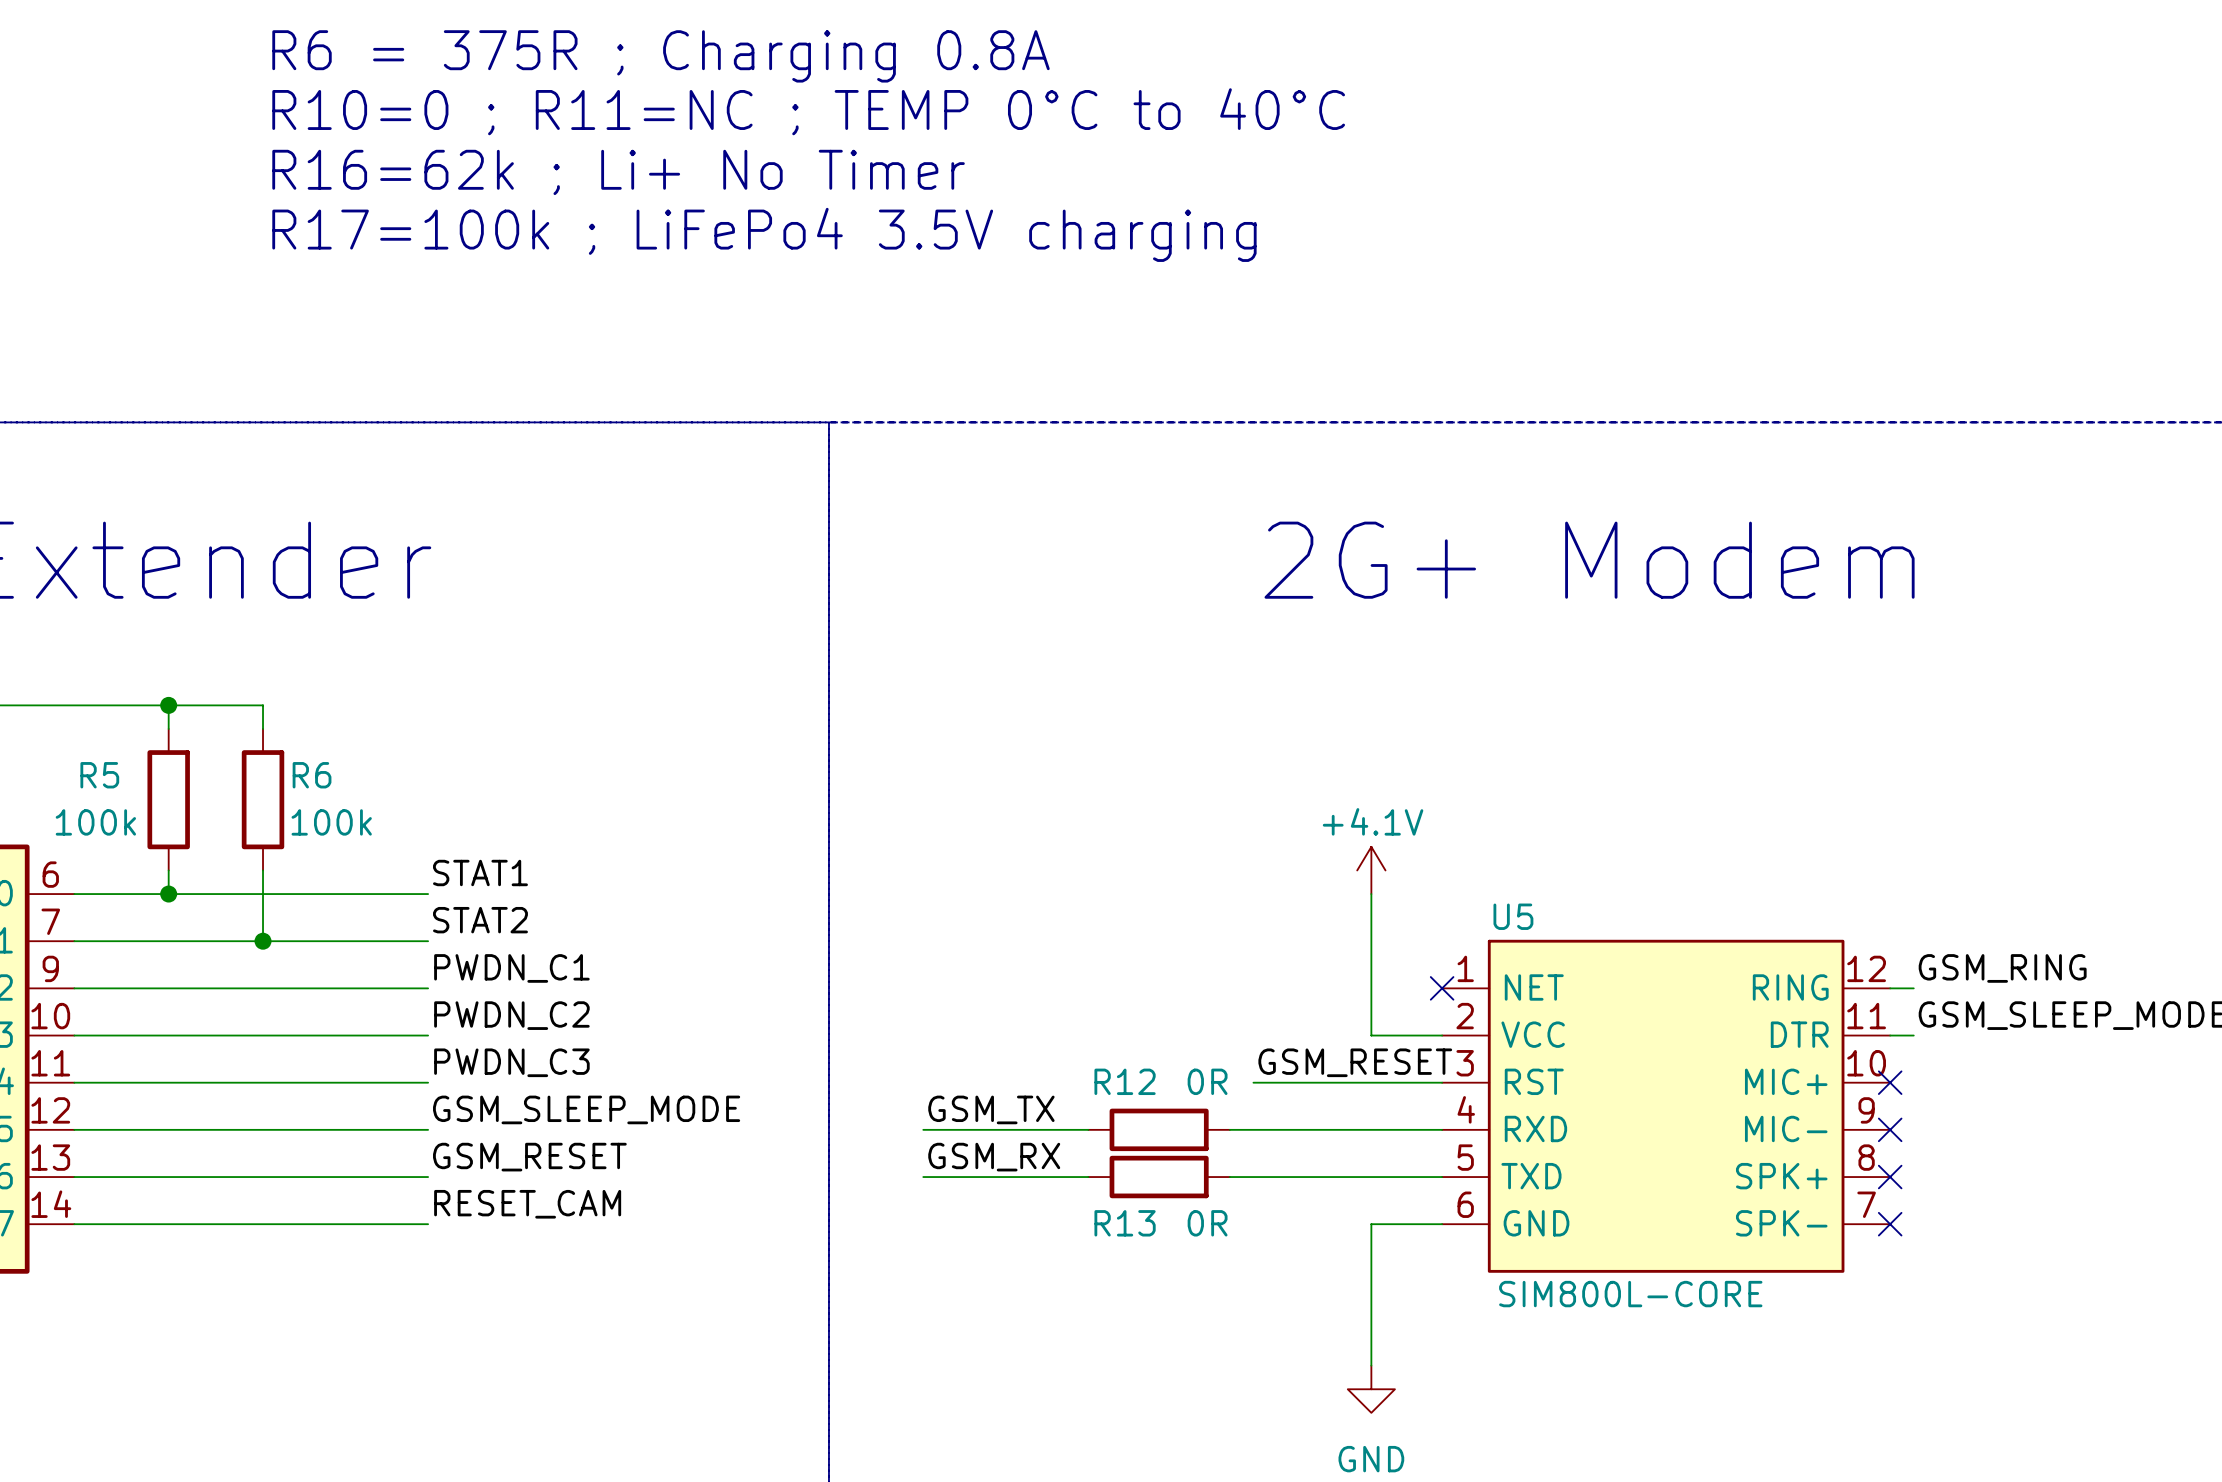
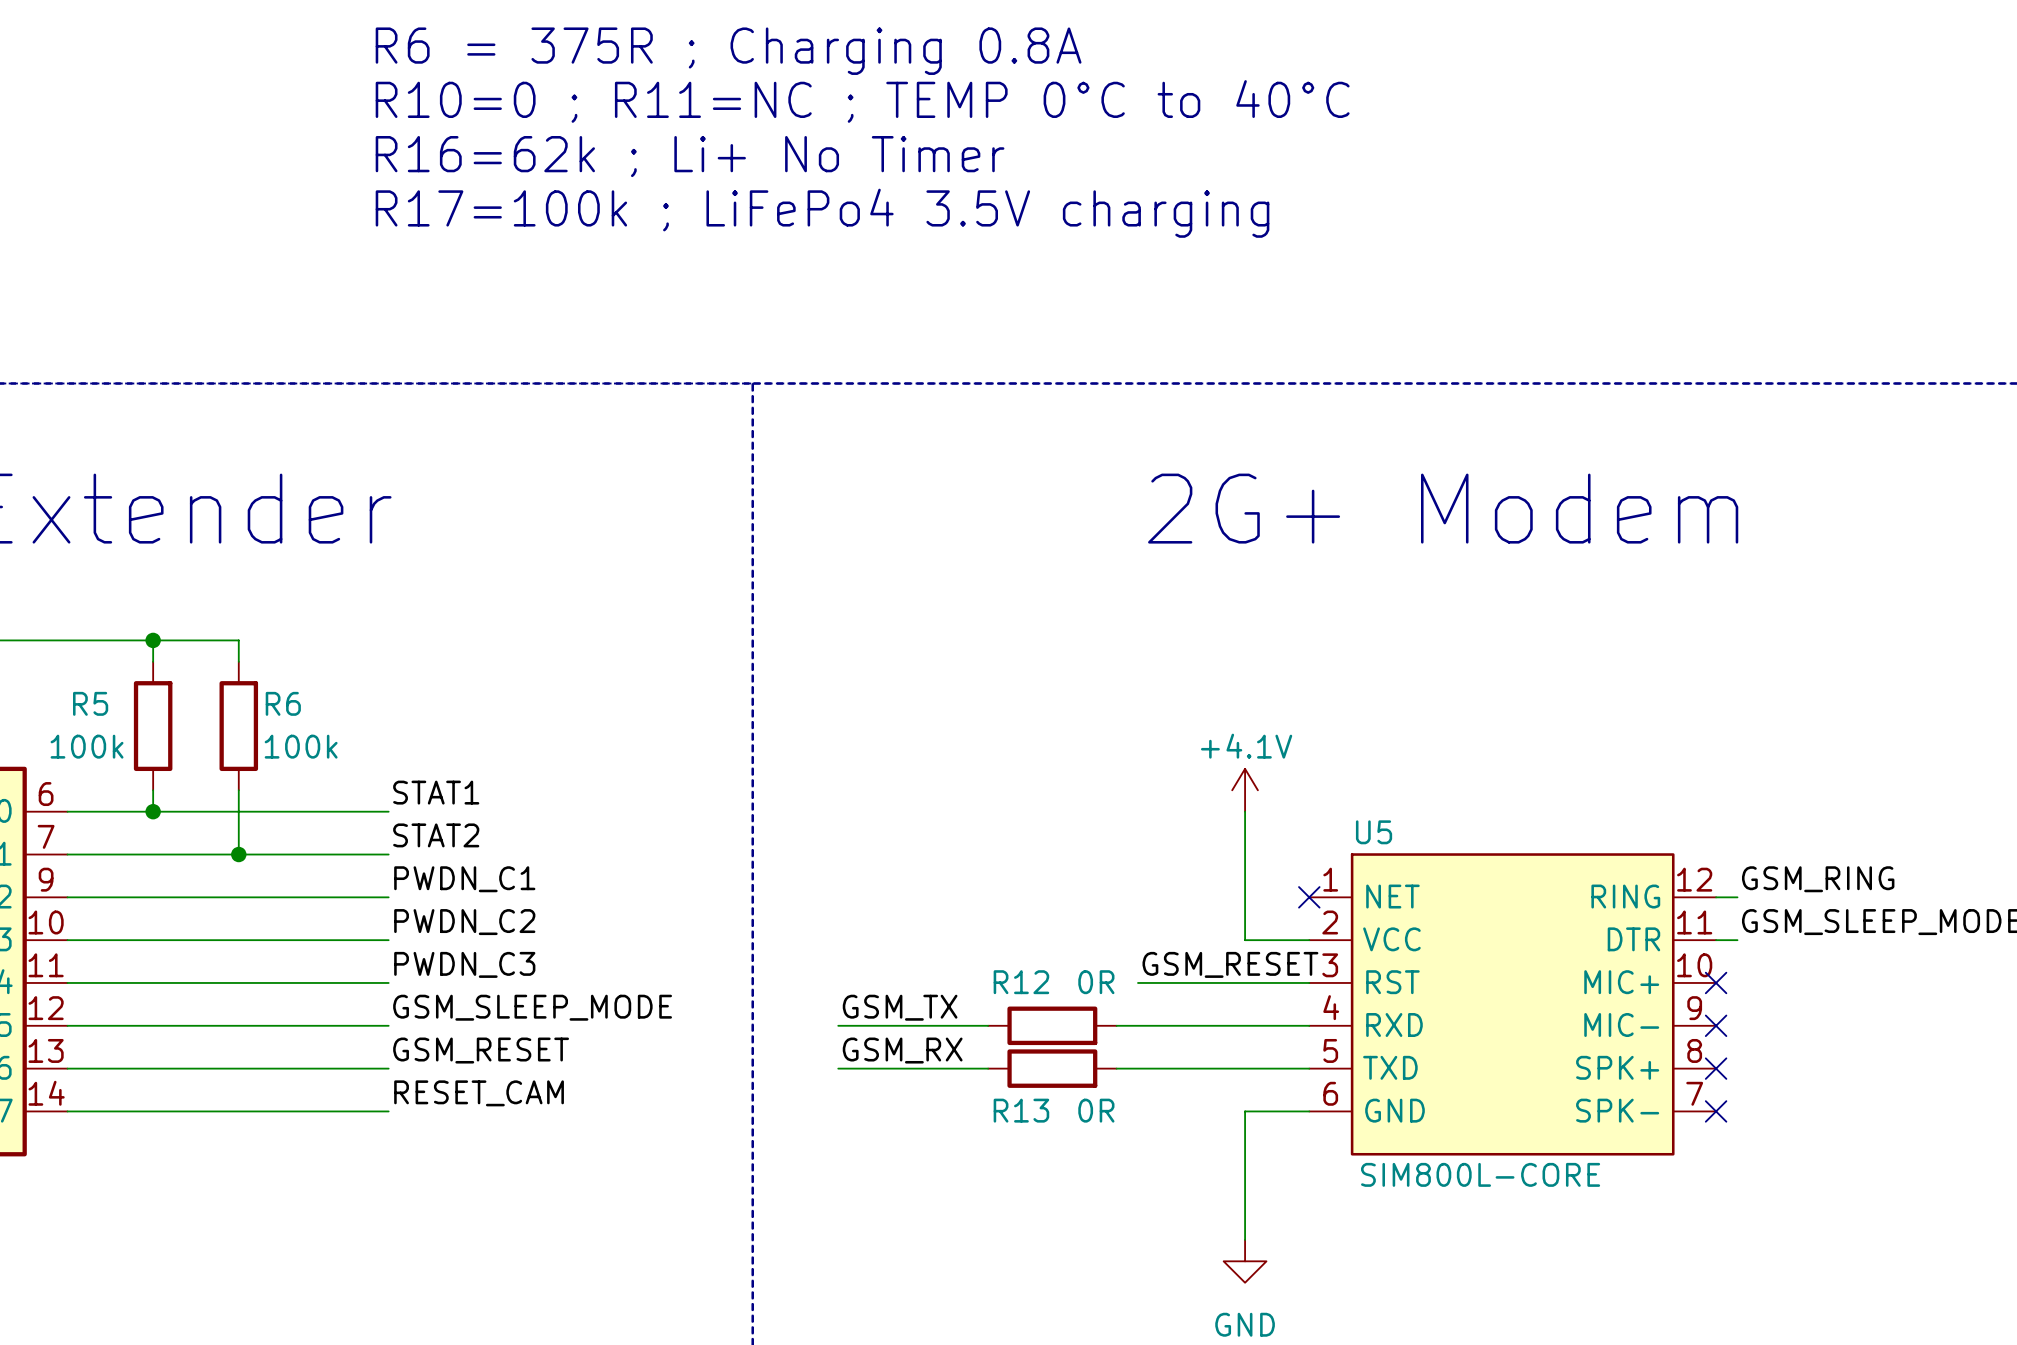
text position: R6 = 375R ; Charging 0.8A (661, 56) -> R6 = 375R ; Charging 0.8A (728, 51)
text position: R10=0 ; R11=NC ; TEMP 0°C to 40°C (808, 111) -> R10=0 ; R11=NC ; TEMP 0°C to 40°C (862, 101)
text position: R16=62k ; Li+ No Timer (618, 172) -> R16=62k ; Li+ No Timer (690, 156)
text position: R17=100k ; LiFePo4 3.5V charging (764, 234) -> R17=100k ; LiFePo4 3.5V charging (822, 213)

